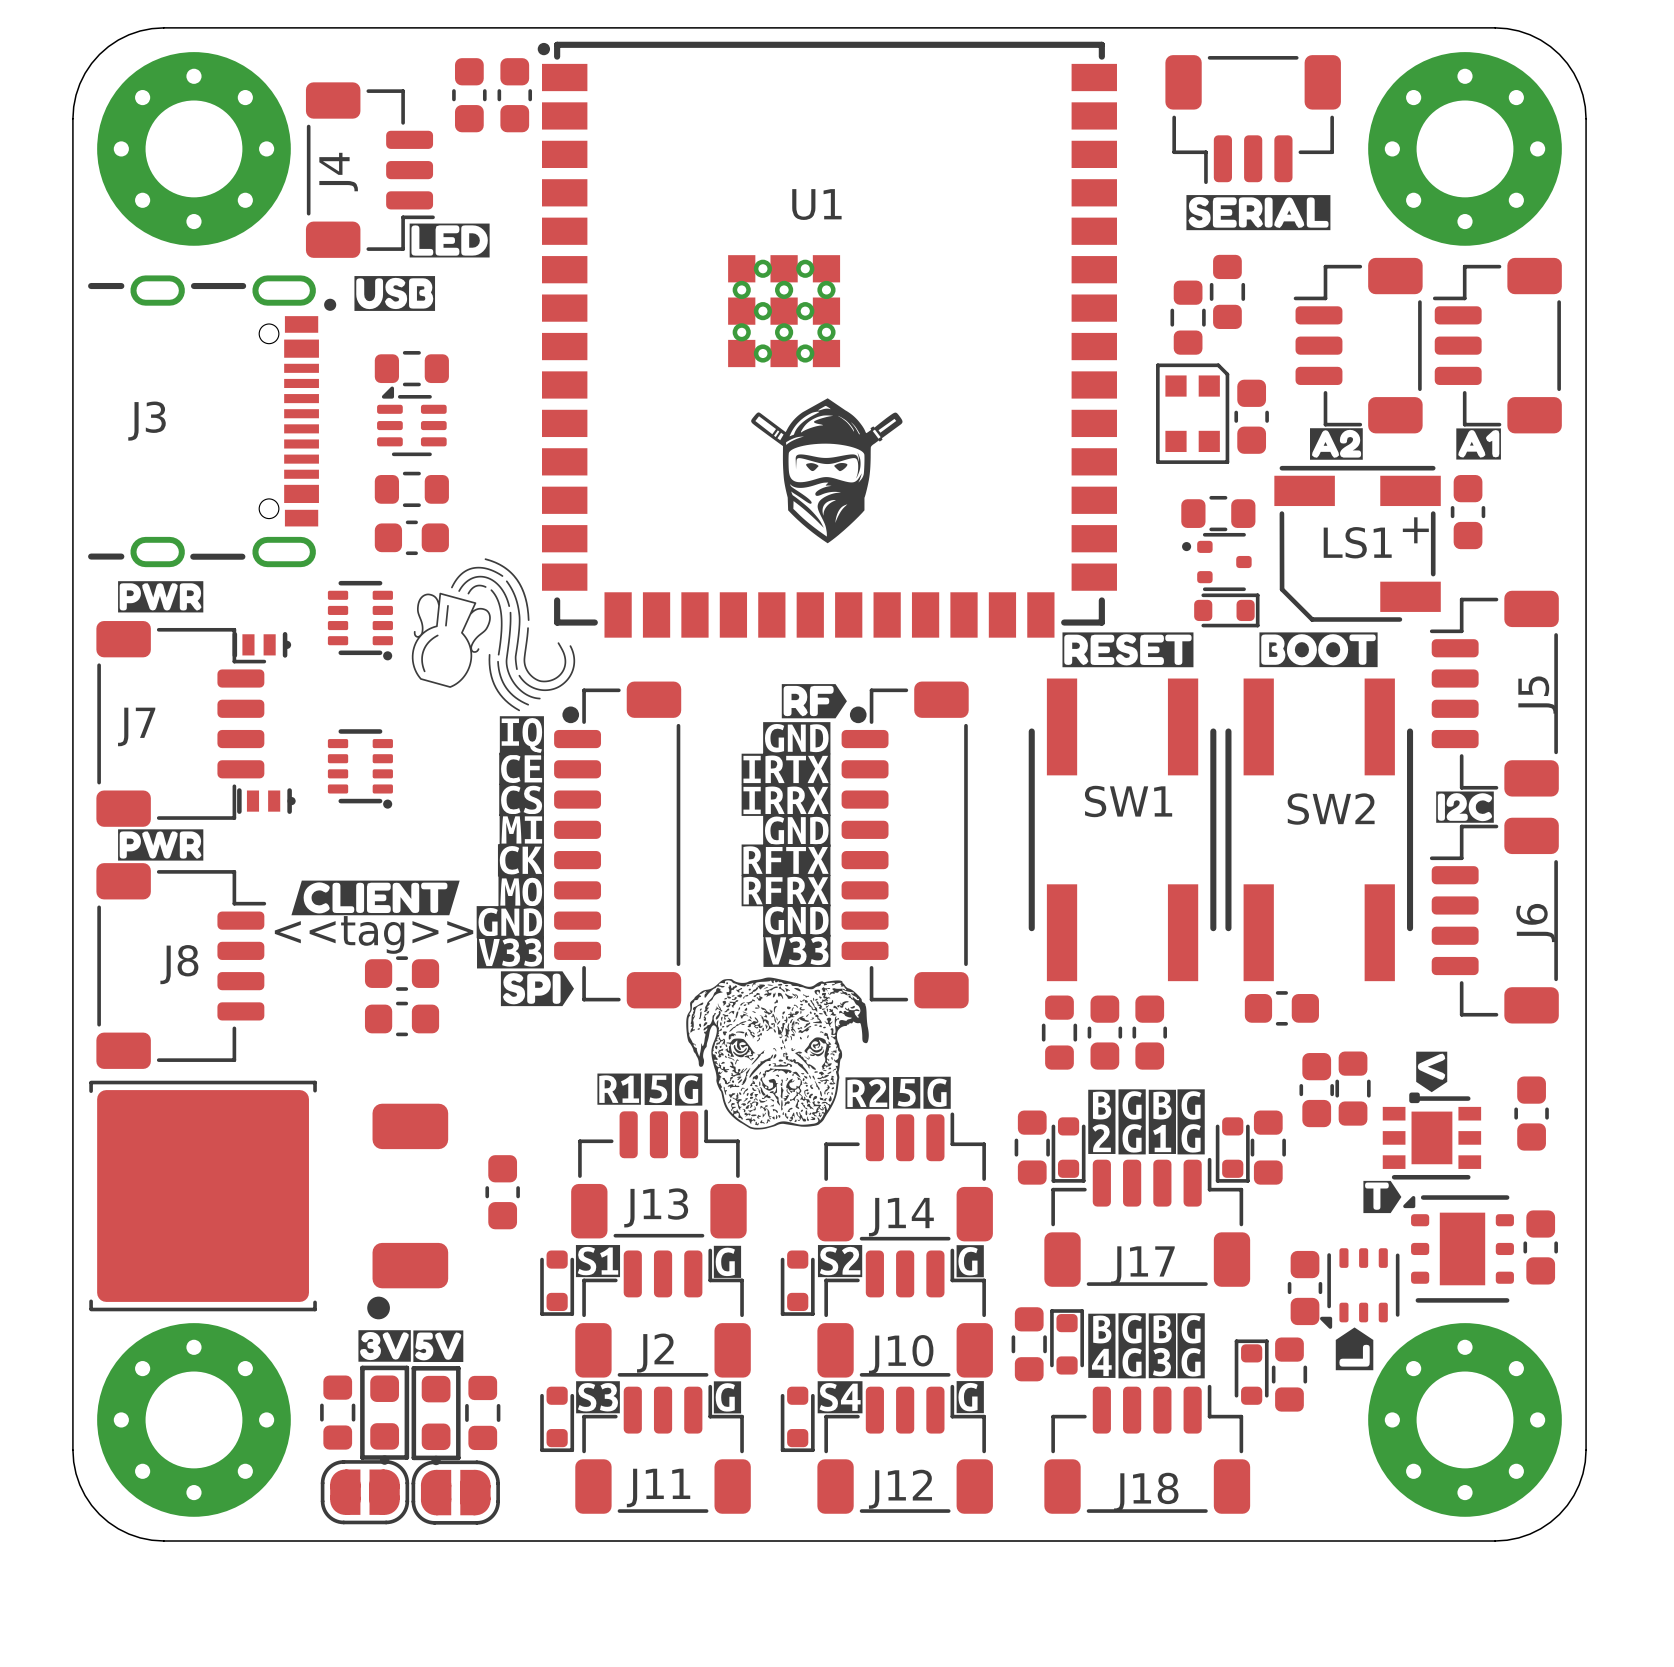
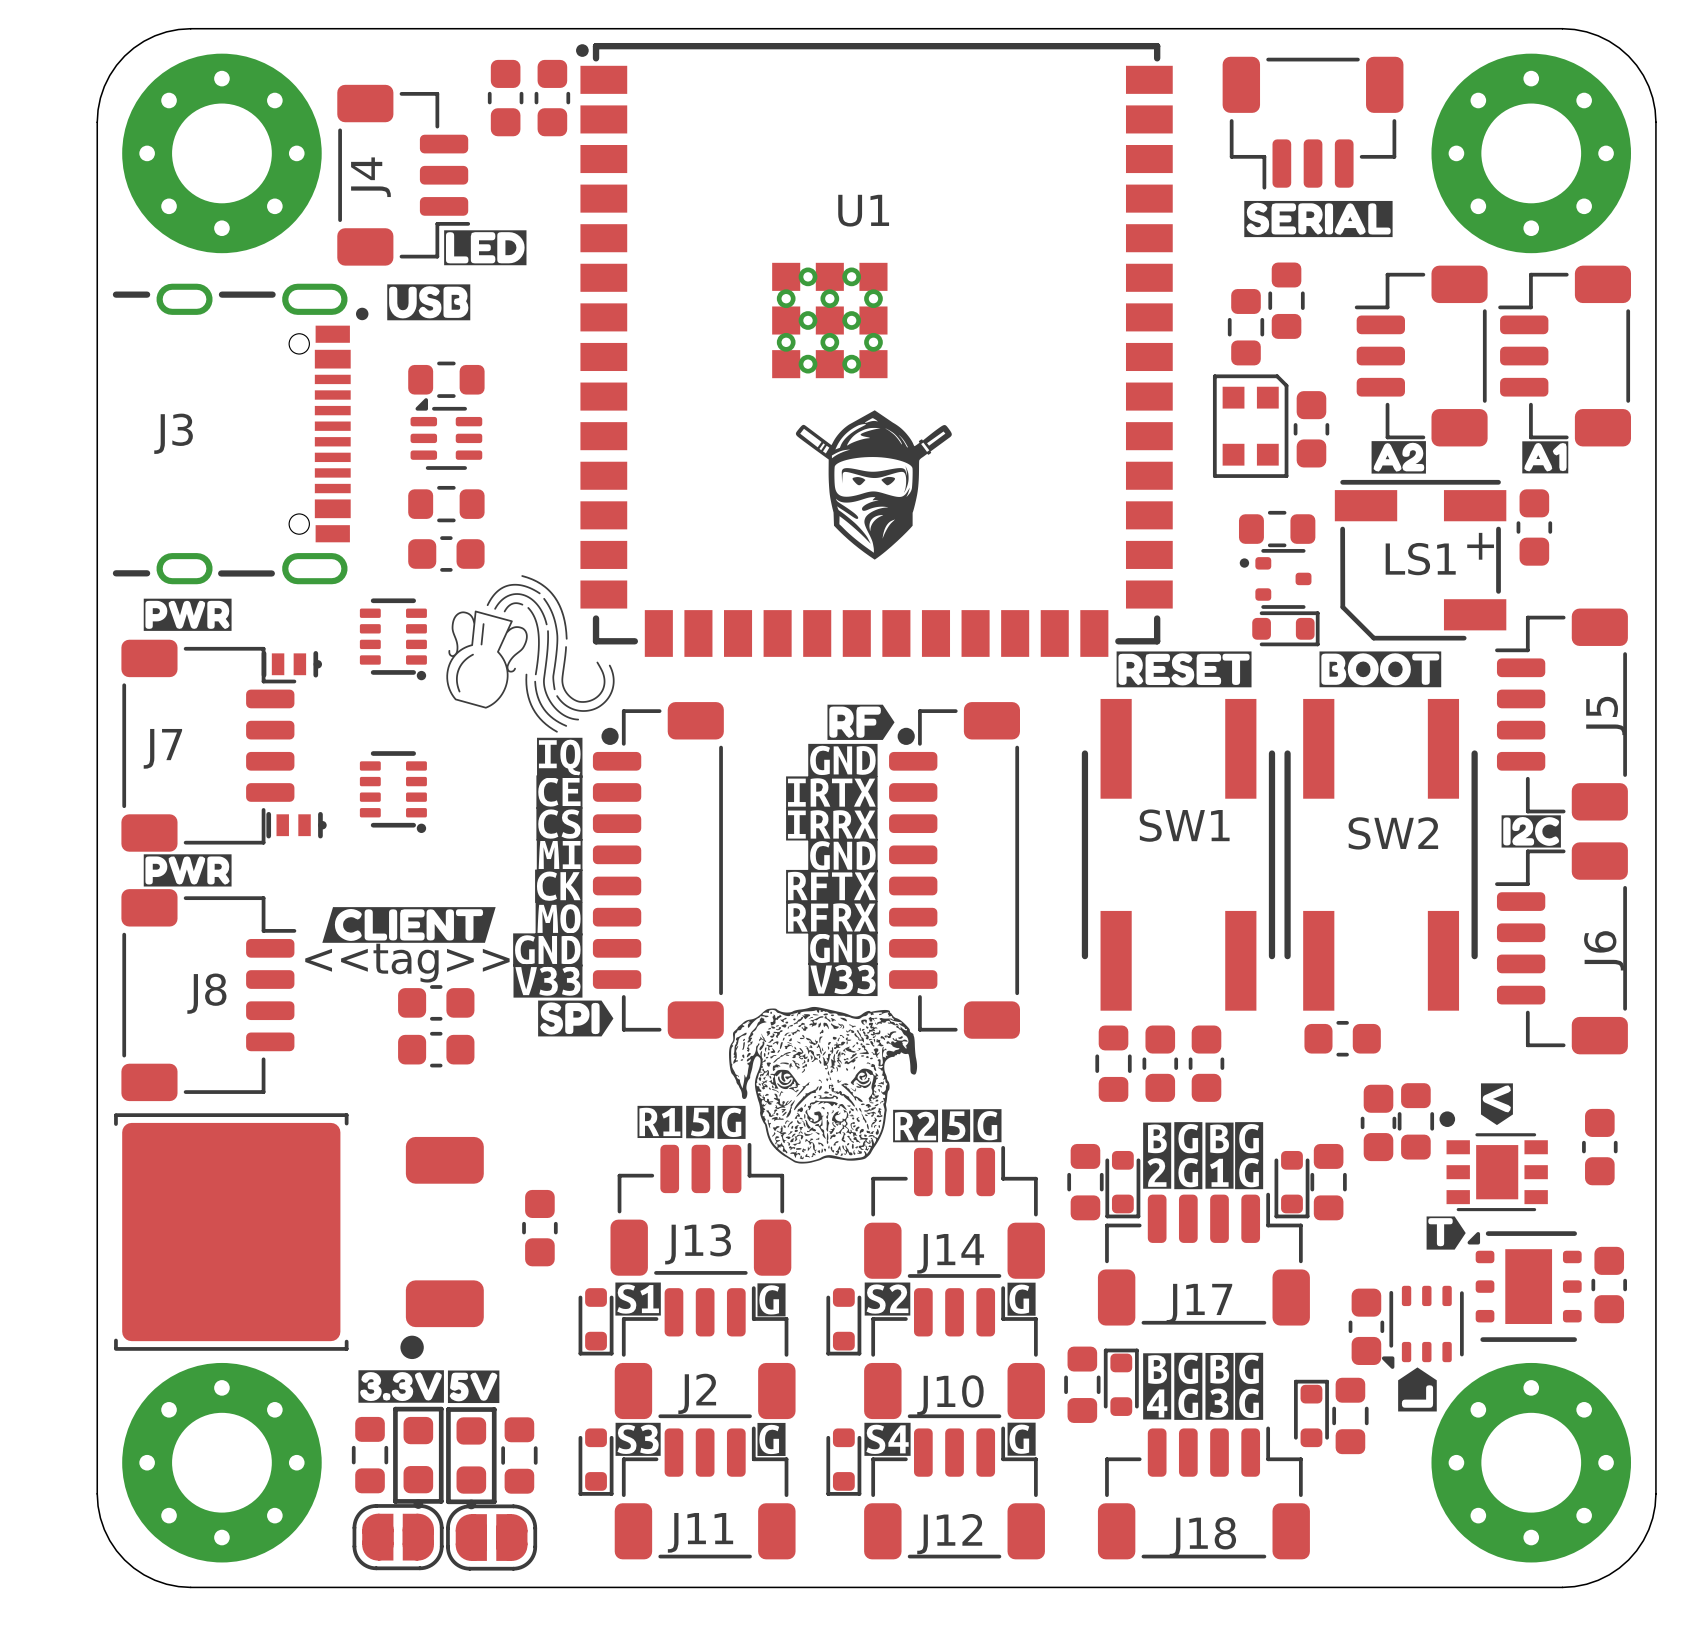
part footprint: [1382, 1092, 1482, 1180] -> [1439, 1111, 1548, 1212]
drawing shape: [358, 1330, 411, 1362] -> [358, 1370, 444, 1403]

